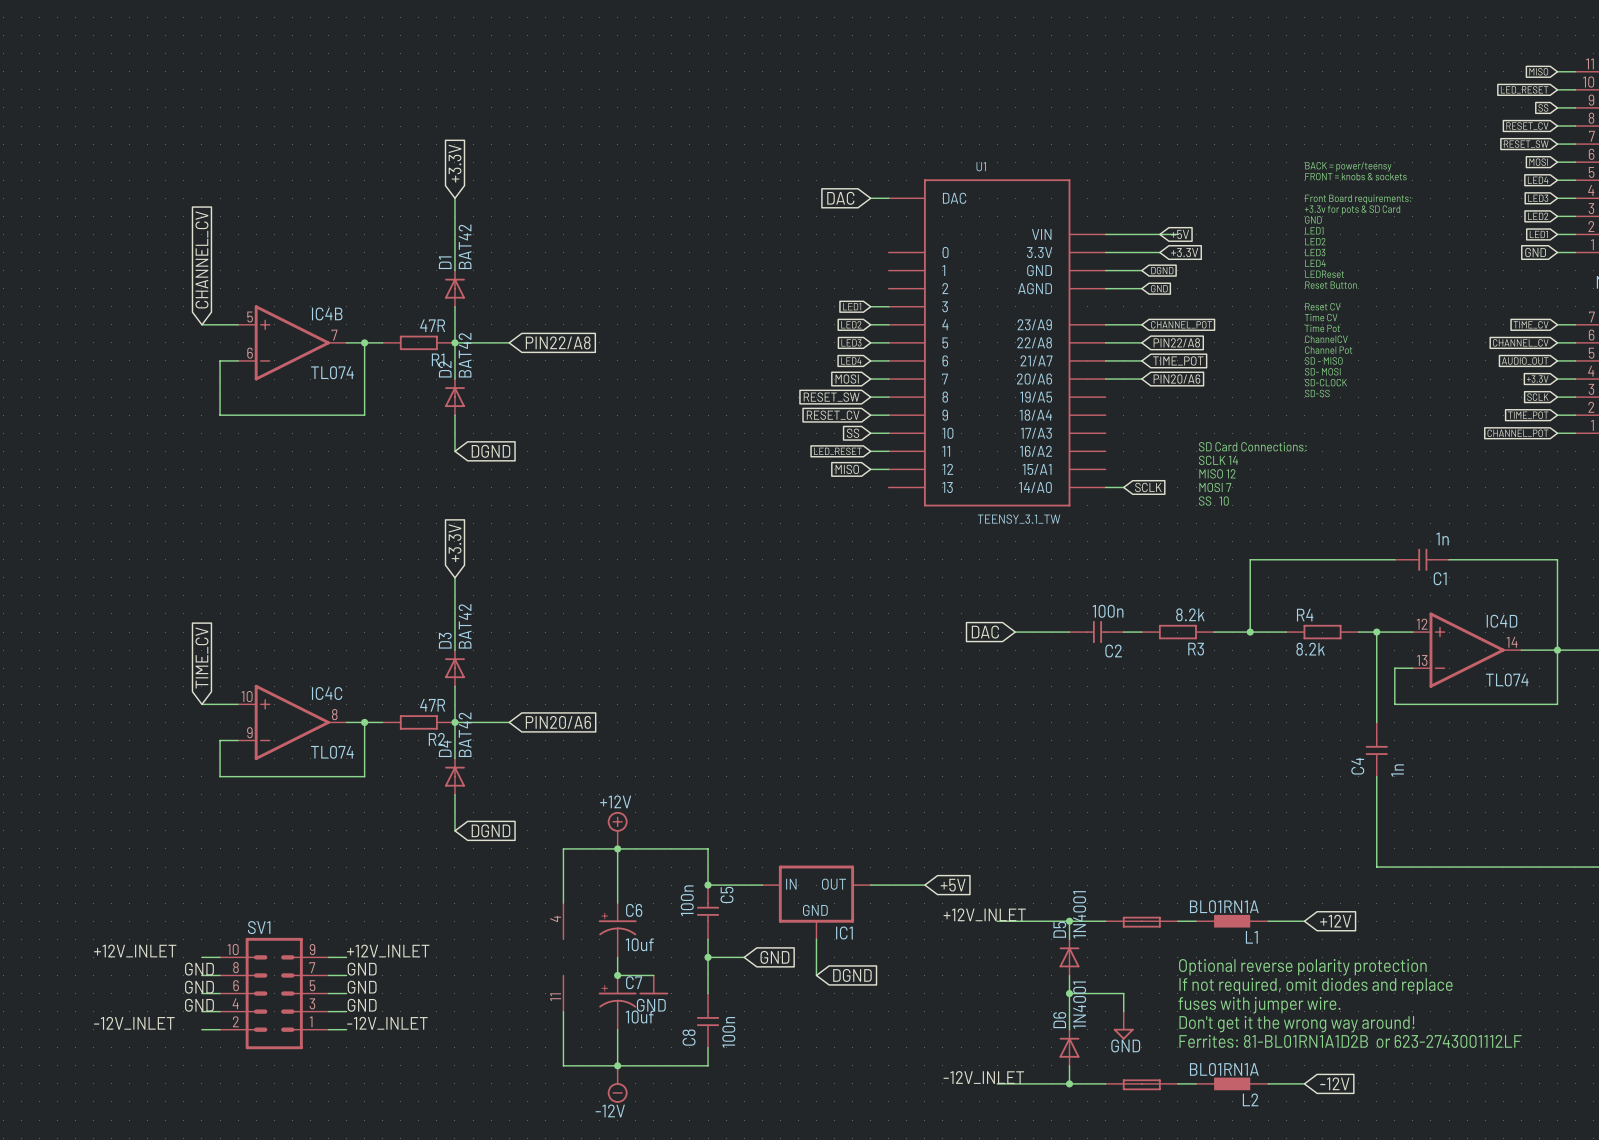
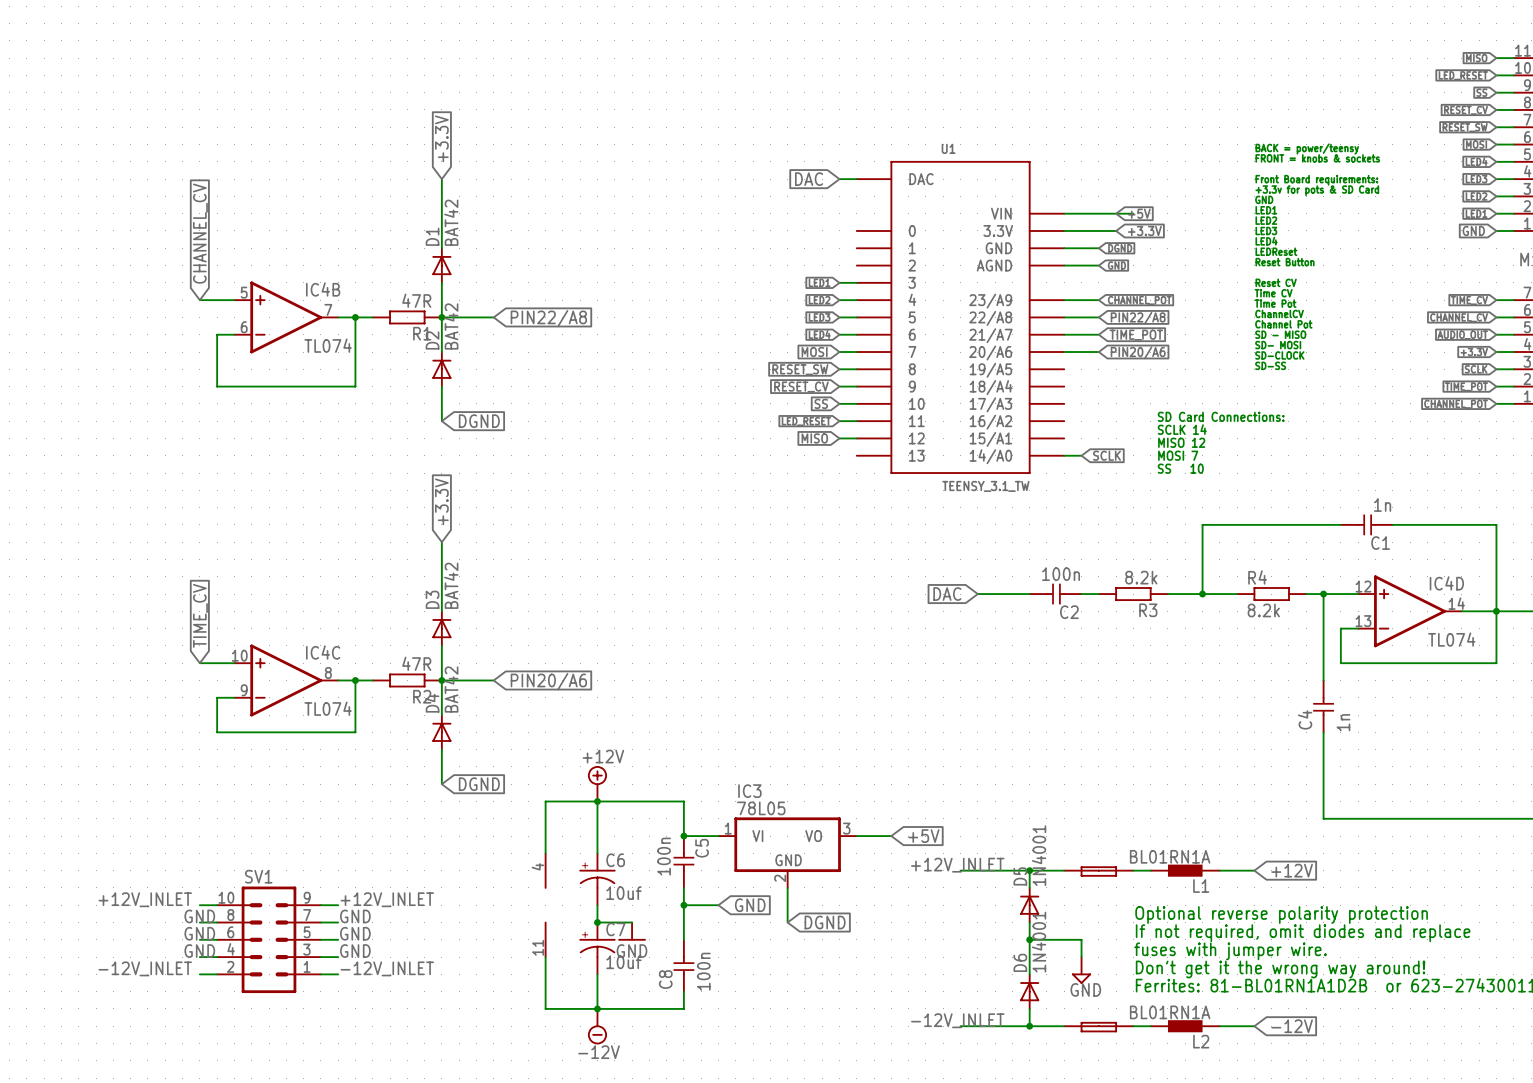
IC1: (816, 902) -> none
IC3: none -> 78L05 (787, 852)

